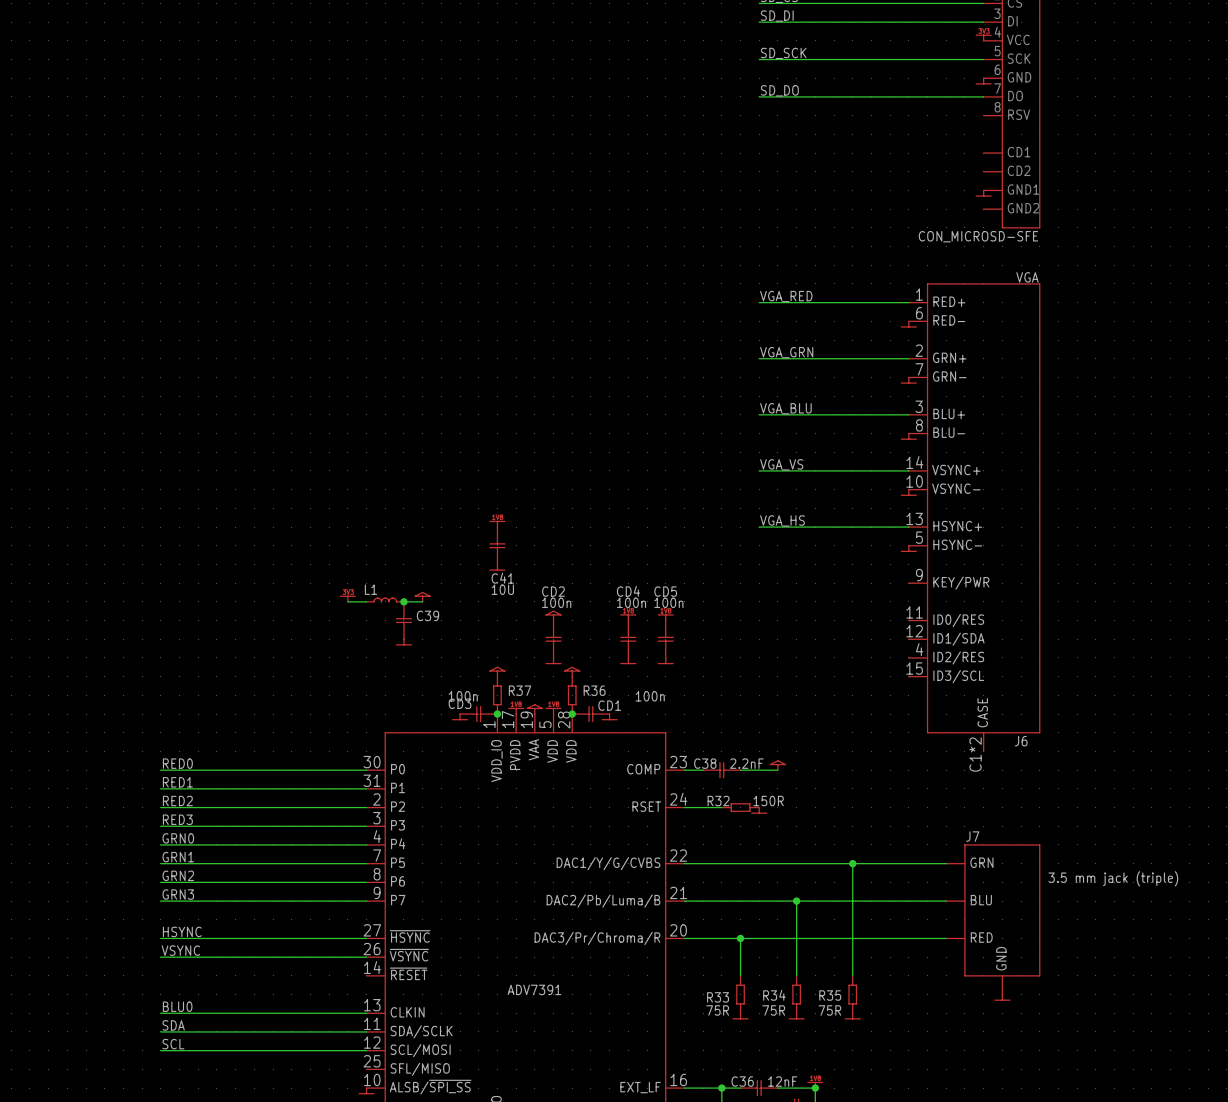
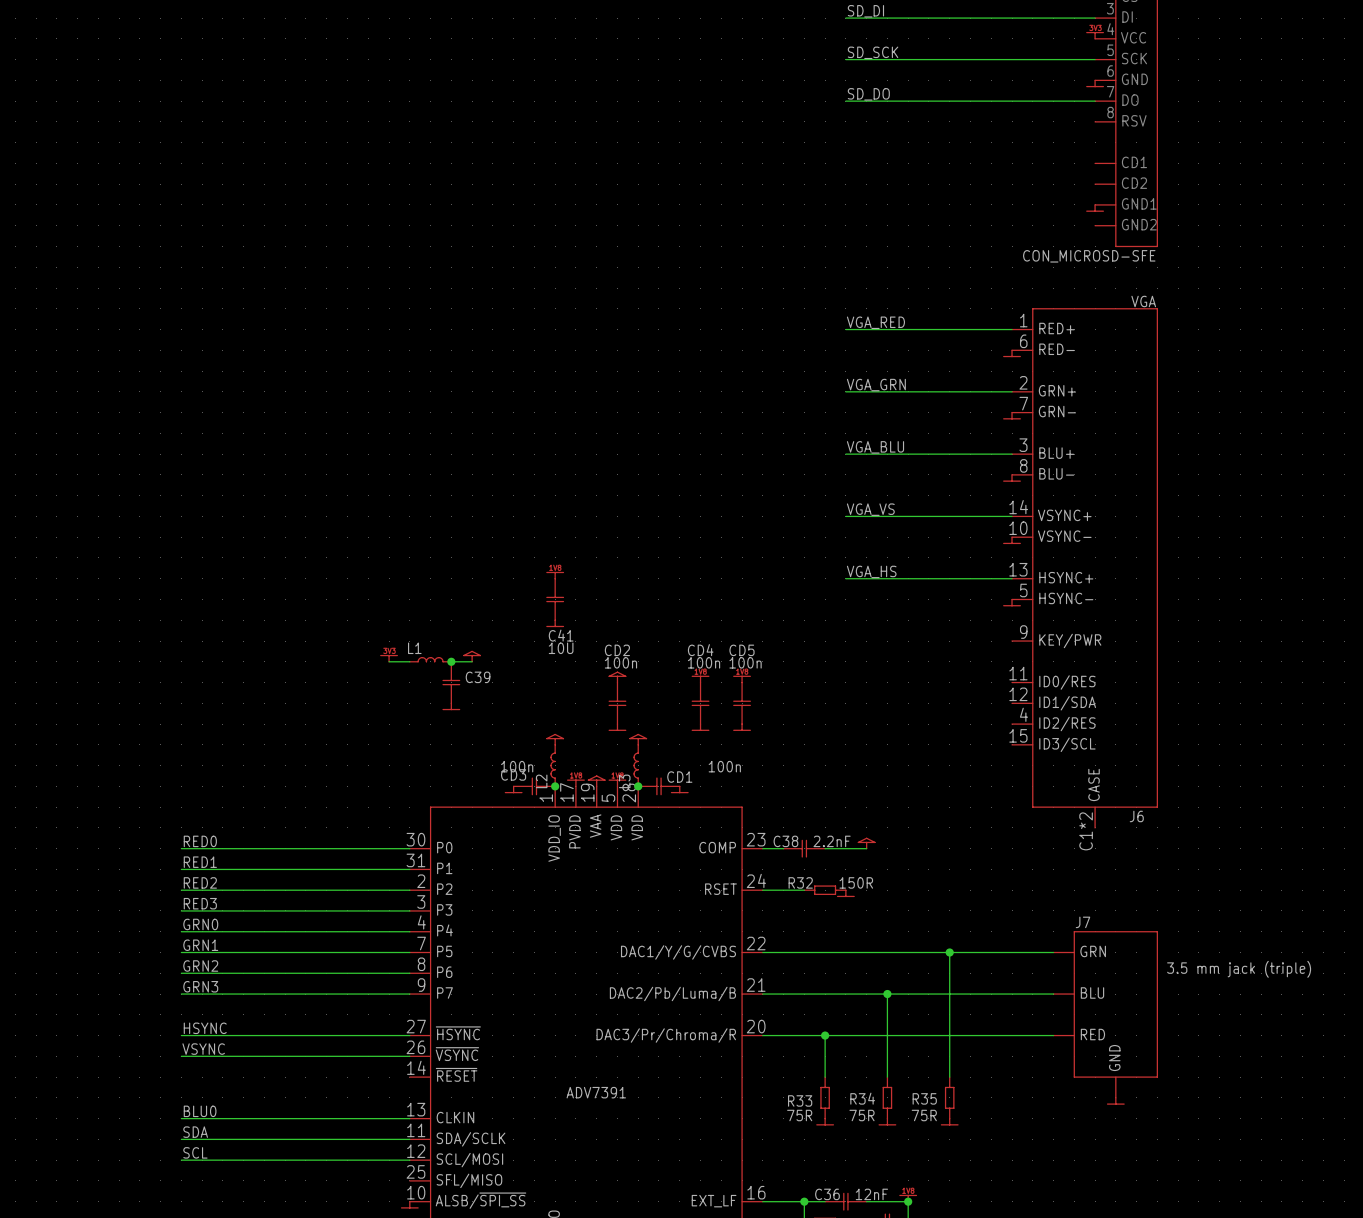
L2: none -> (553, 765)
R37: (497, 695) -> none
L3: none -> (636, 765)
R36: (572, 695) -> none

